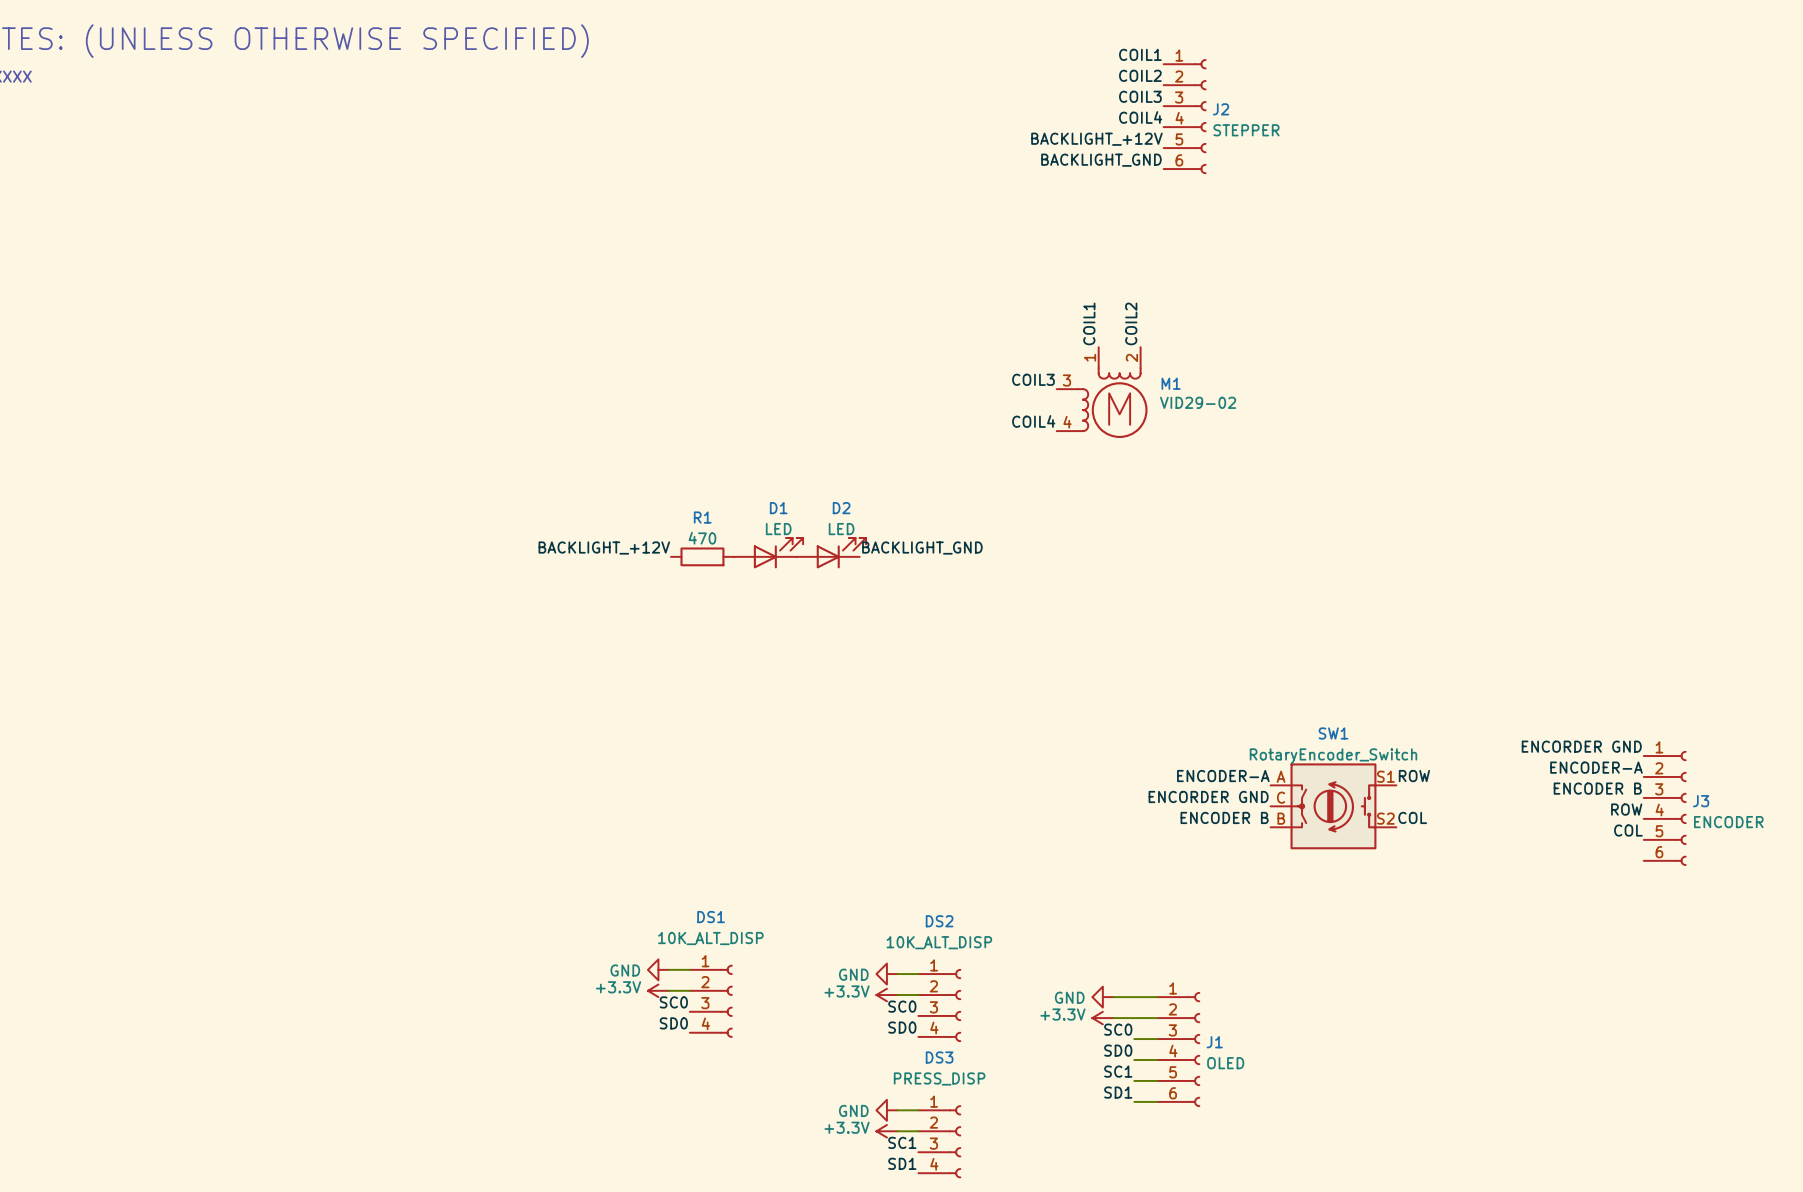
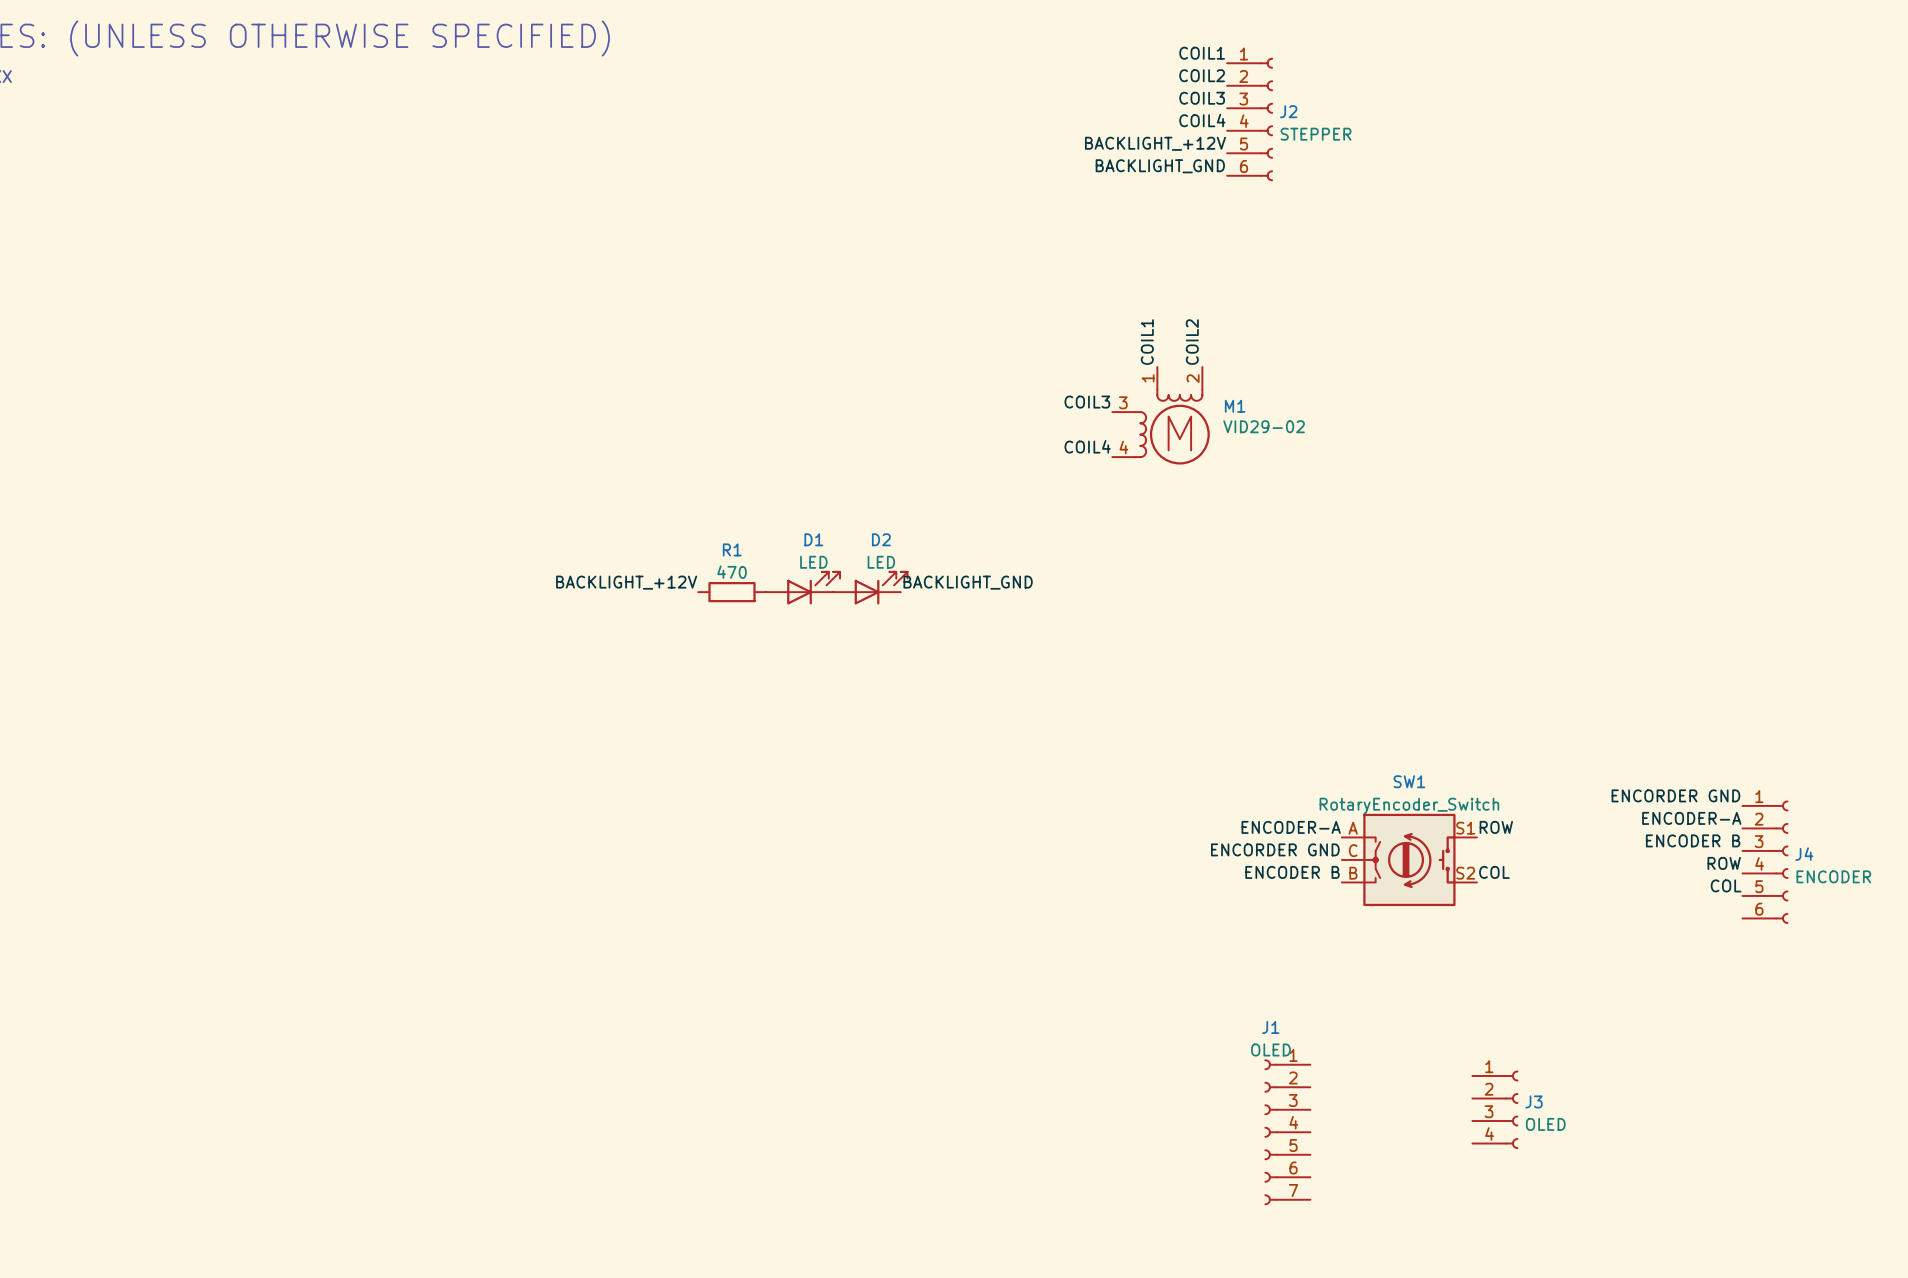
J3 name: J3 (1701, 801) -> J4 (1804, 854)
power symbol: GND (658, 969) -> none
wire: (668, 969) (689, 969) -> none
power symbol: GND (886, 974) -> none
wire: (897, 974) (918, 974) -> none
power symbol: +3.3V (658, 990) -> none
wire: (668, 990) (689, 990) -> none
J1 symbol: [1157, 992, 1200, 1107] -> [1264, 1059, 1311, 1205]
power symbol: +3.3V (886, 995) -> none
wire: (897, 995) (918, 995) -> none
power symbol: GND (1102, 997) -> none
wire: (1113, 997) (1157, 997) -> none
DS1: 10K_ALT_DISP (711, 1001) -> none
label: SC0 (673, 1002) -> none
DS2: 10K_ALT_DISP (939, 1005) -> none
label: SC0 (902, 1006) -> none
power symbol: +3.3V (1102, 1018) -> none
wire: (1113, 1018) (1157, 1018) -> none
label: SD0 (673, 1023) -> none
label: SD0 (902, 1027) -> none
label: SC0 (1118, 1029) -> none
wire: (1134, 1039) (1157, 1039) -> none
J3: none -> OLED (1495, 1109)
J1 name position: J1 (1214, 1042) -> J1 (1270, 1027)
label: SD0 (1118, 1050) -> none
wire: (1134, 1060) (1157, 1060) -> none
J1 value position: OLED (1225, 1063) -> OLED (1271, 1049)
label: SC1 (1118, 1071) -> none
wire: (1134, 1080) (1157, 1080) -> none
label: SD1 (1118, 1092) -> none
wire: (1134, 1101) (1157, 1101) -> none
power symbol: GND (886, 1110) -> none
wire: (897, 1110) (918, 1110) -> none
power symbol: +3.3V (886, 1131) -> none
wire: (897, 1131) (918, 1131) -> none
DS3: PRESS_DISP (939, 1141) -> none
label: SC1 (902, 1142) -> none
label: SD1 (902, 1163) -> none

